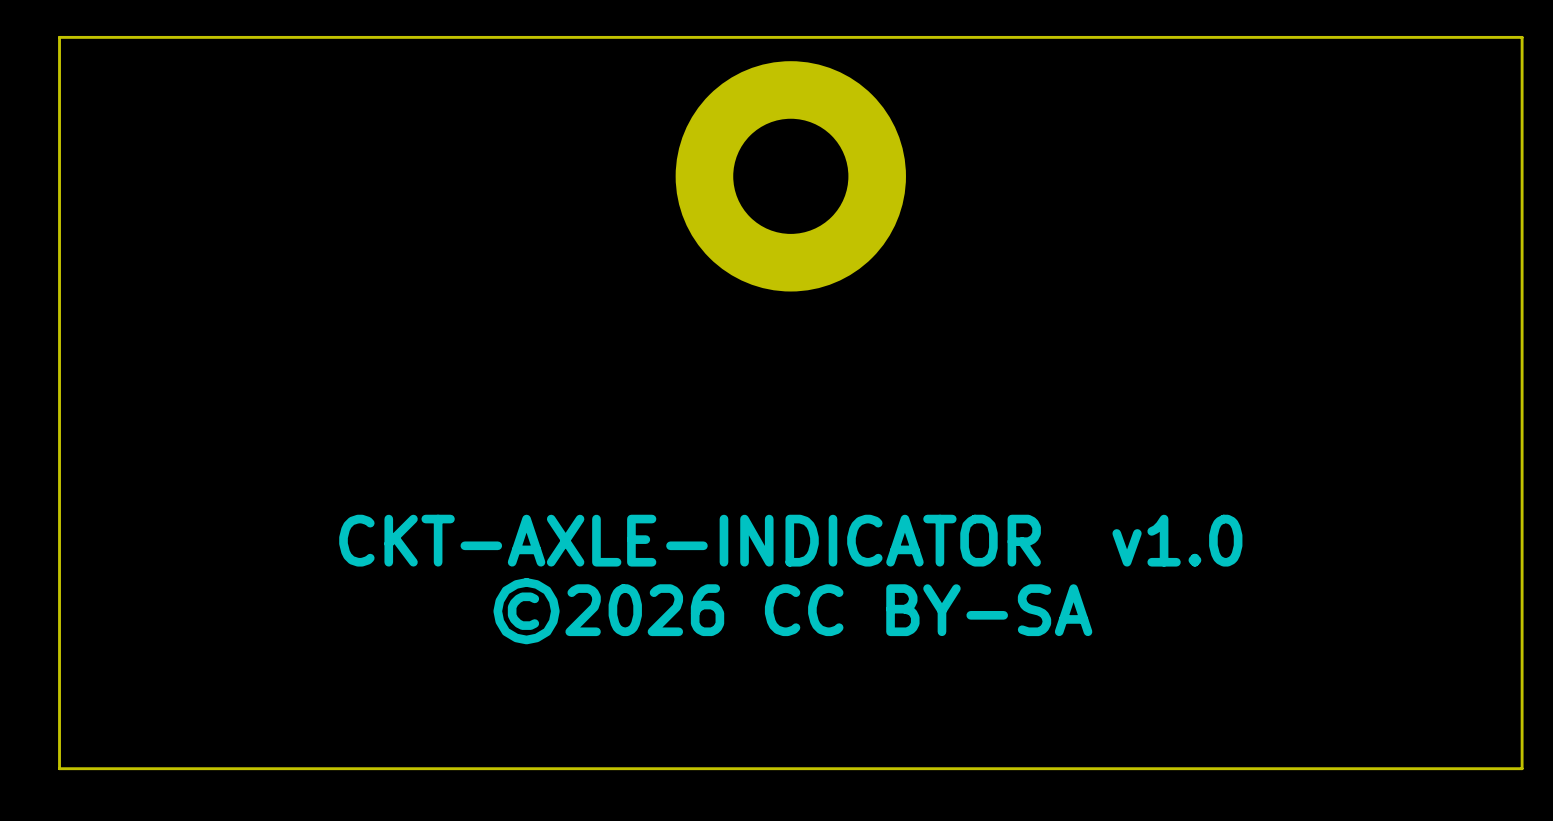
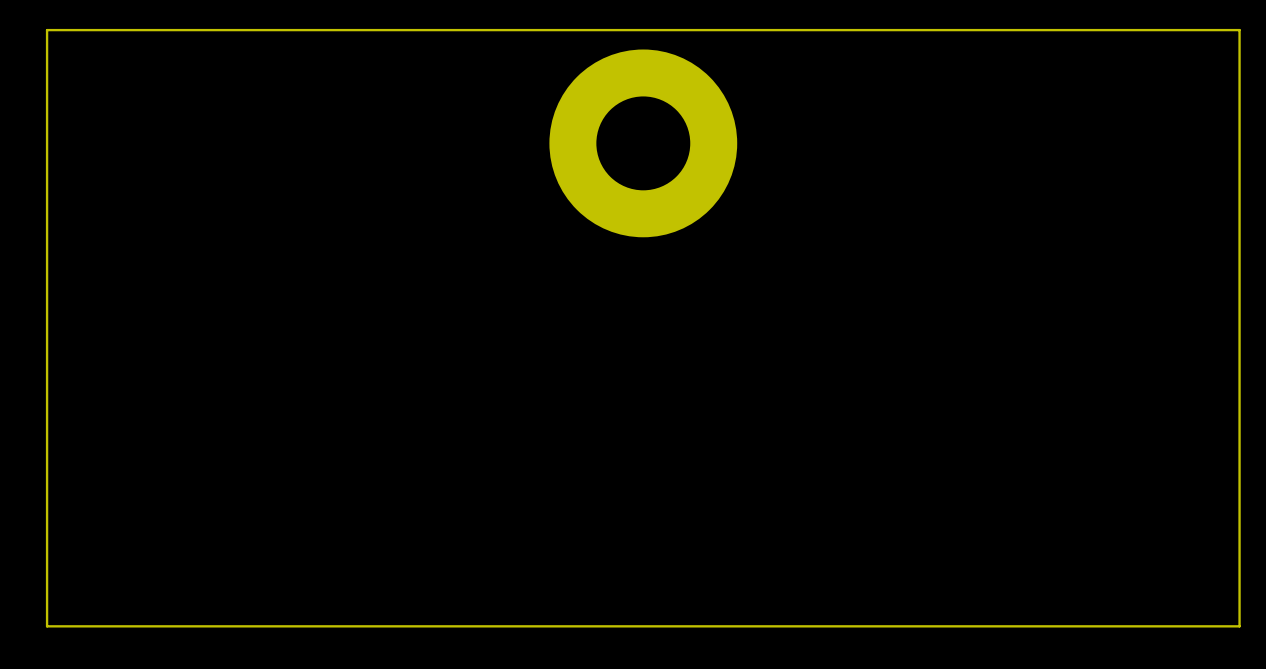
text: CKT-AXLE-INDICATOR v1.0 (790, 540) -> none
text: ©2026 CC BY-SA (792, 611) -> none

